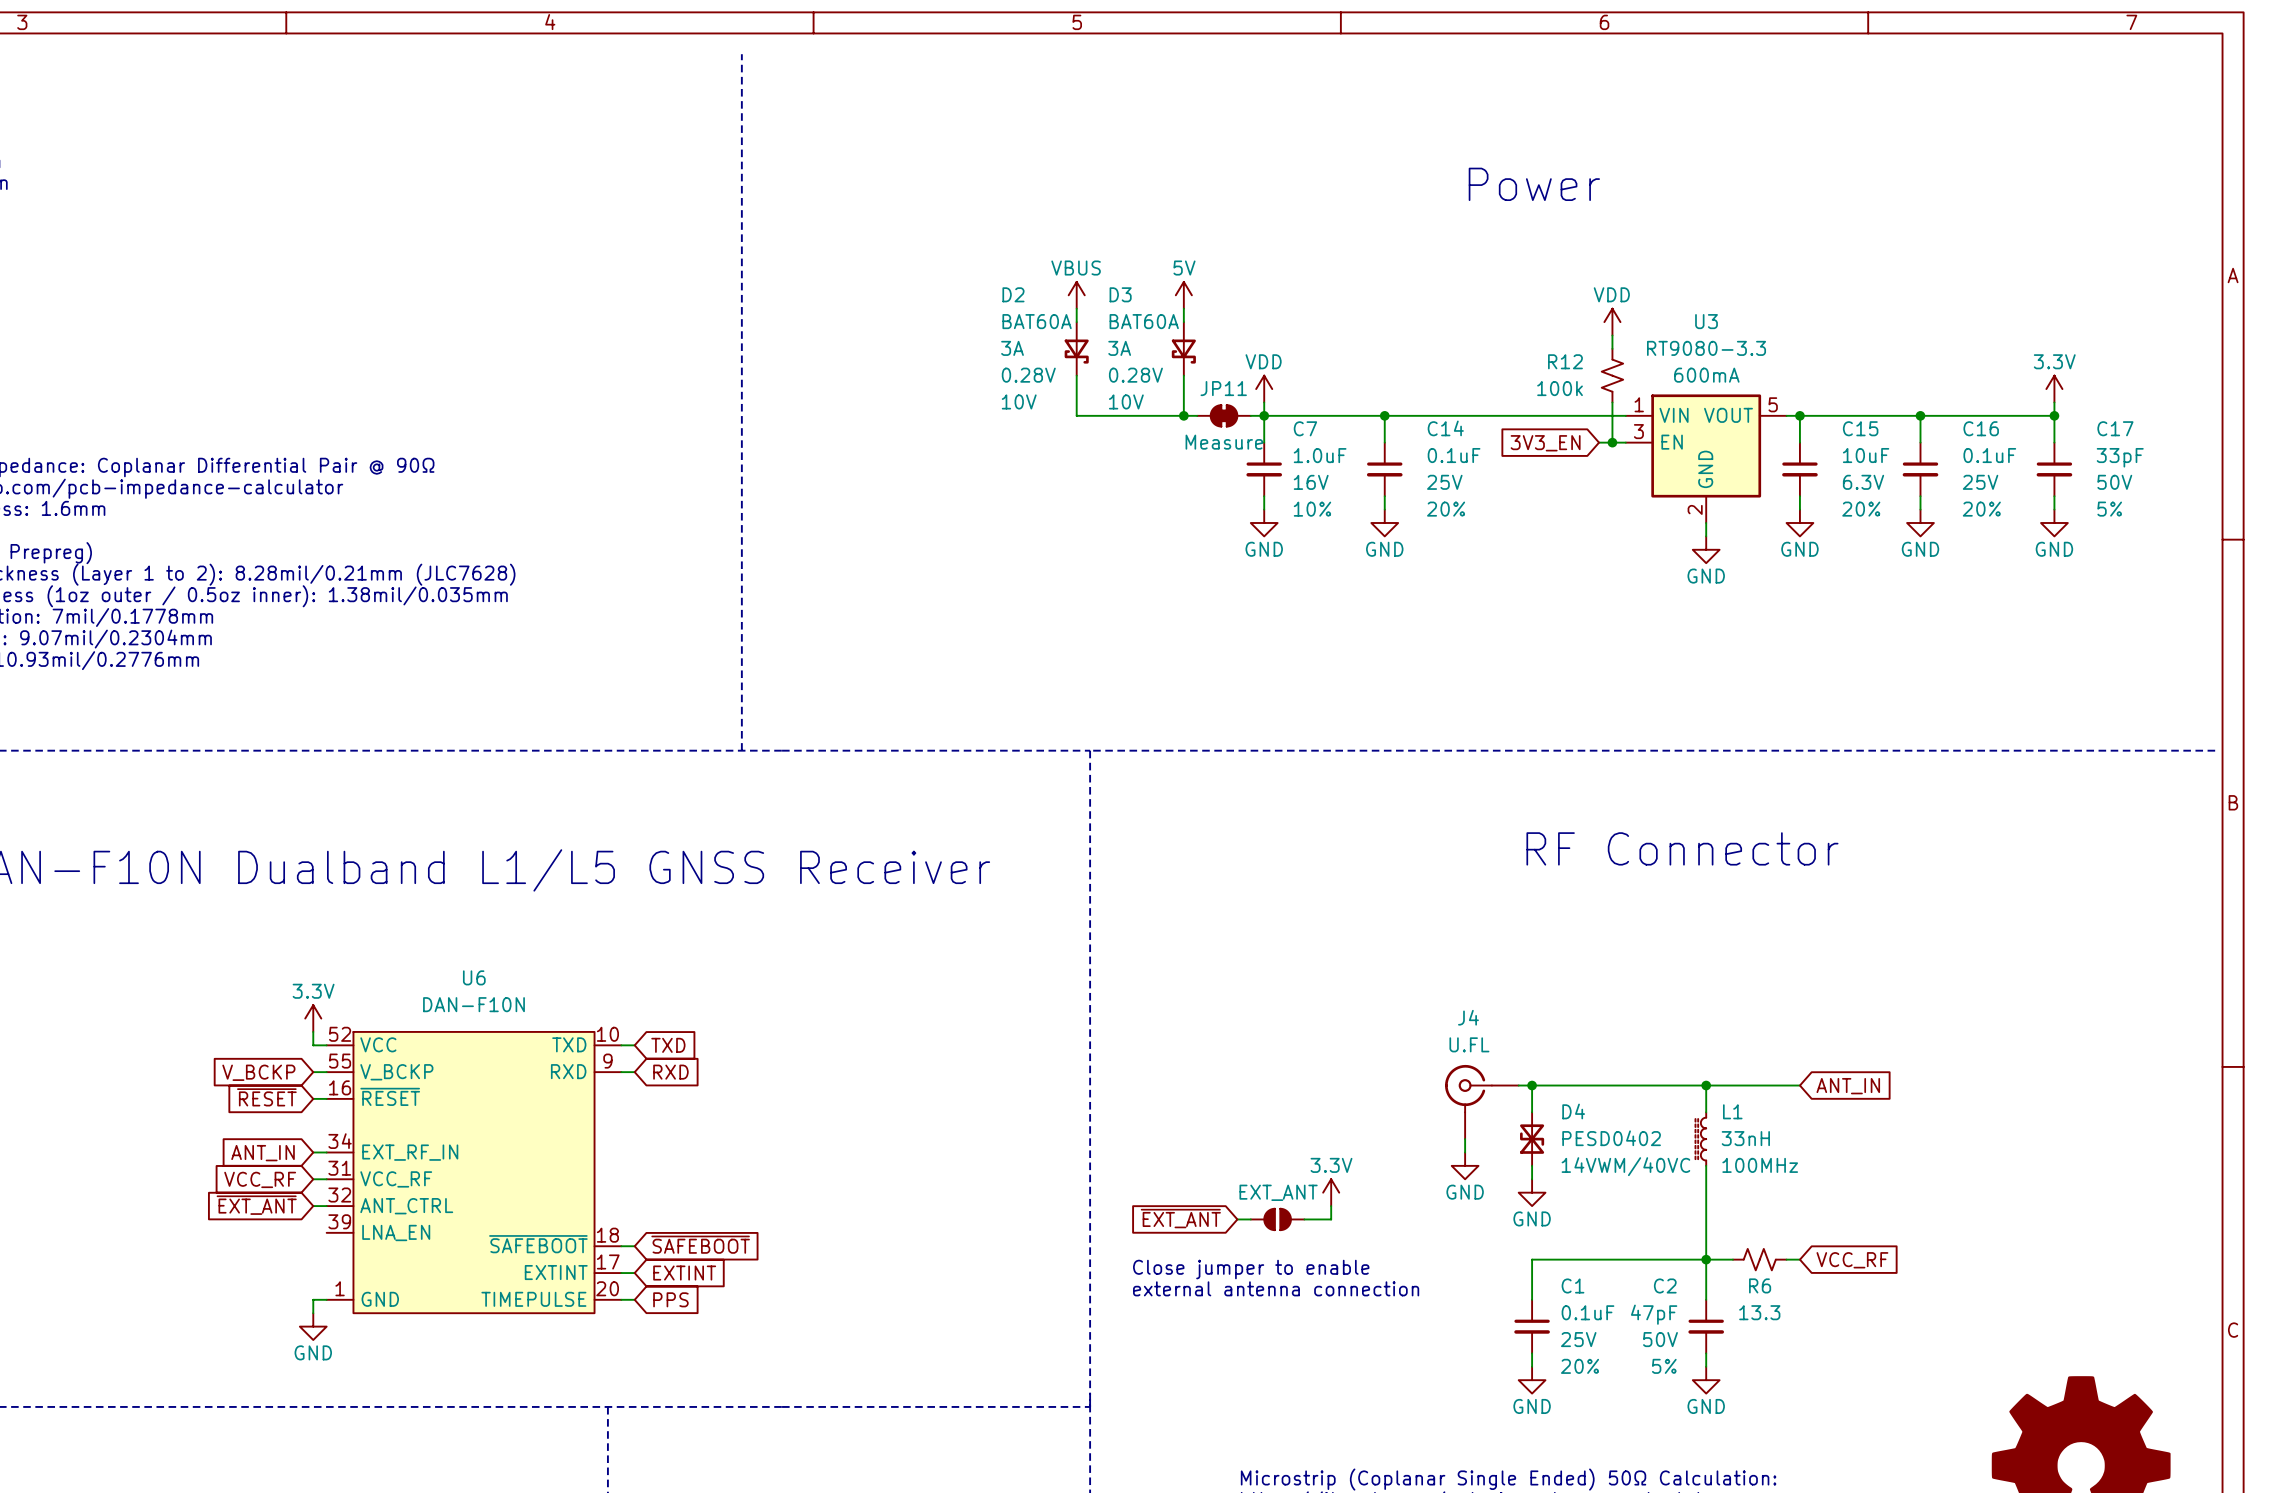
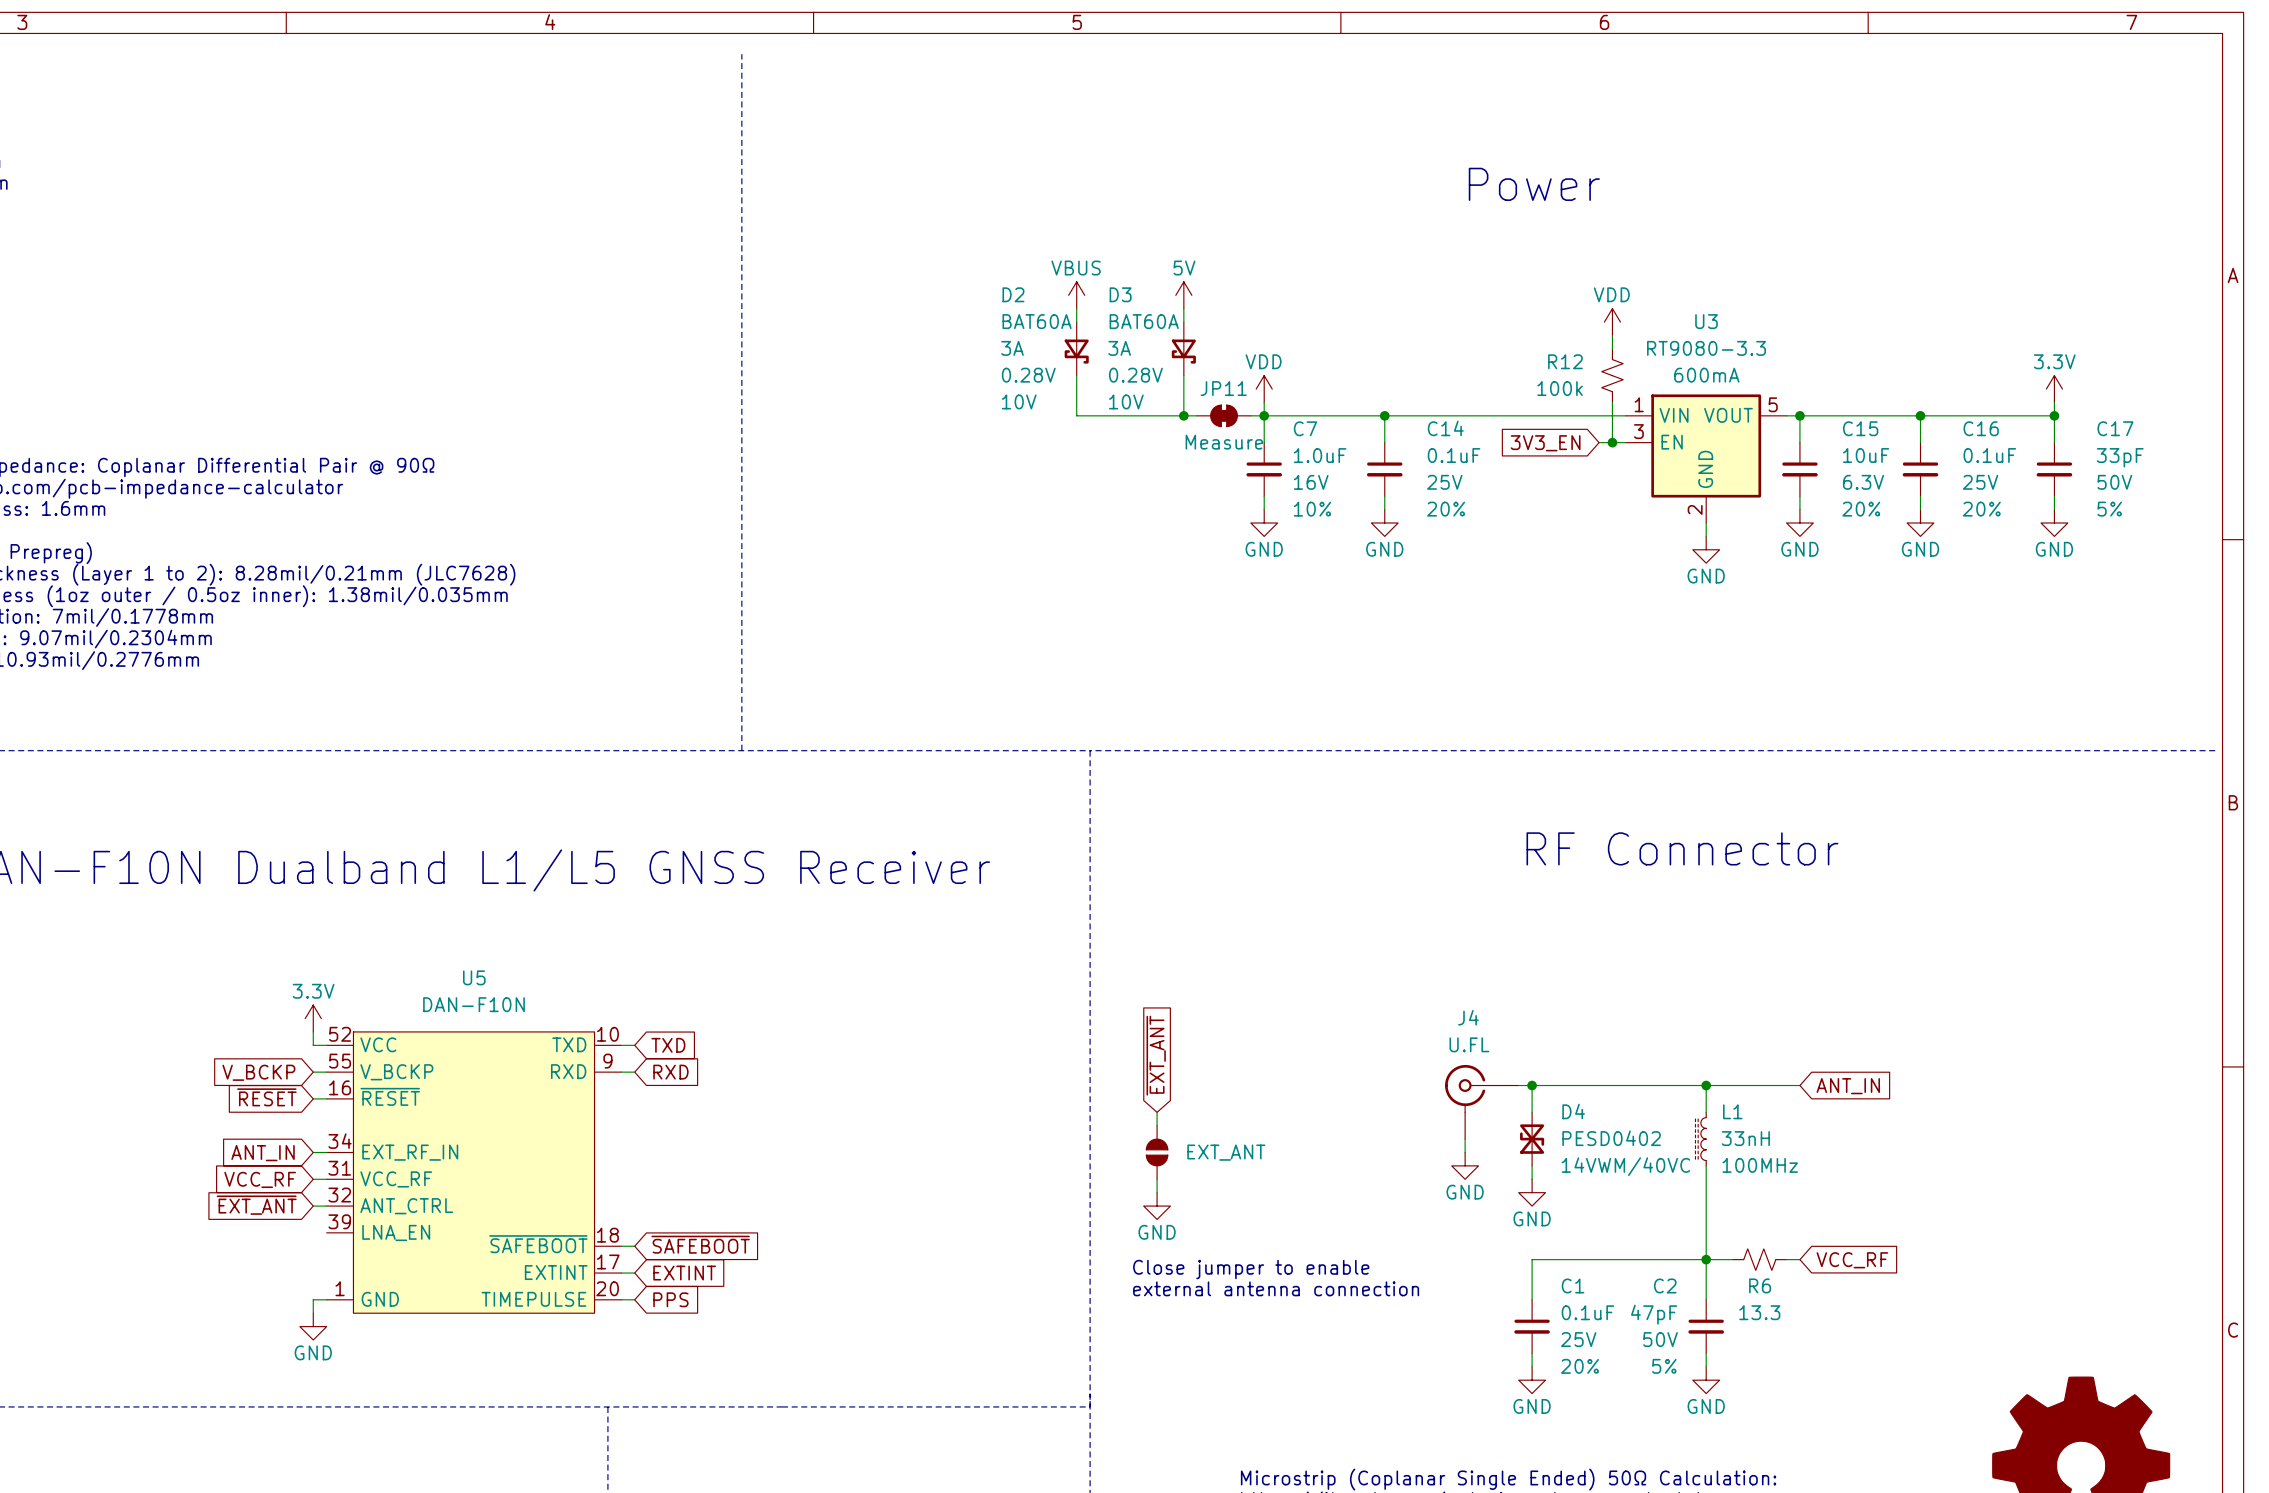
U6 name: U6 (474, 977) -> U5 (474, 977)
wire: none -> (1157, 1112) (1157, 1125)
wire: none -> (1157, 1179) (1157, 1192)
part value position: EXT_ANT (1278, 1192) -> EXT_ANT (1226, 1152)
power symbol: 3.3V (1331, 1192) -> none
power symbol: none -> GND (1157, 1206)
wire: (1331, 1206) (1331, 1219) (1304, 1219) -> none
global label rotation: 0° (1180, 1218) -> 90° clockwise (1156, 1055)
global label position: ~{EXT_ANT} (1180, 1218) -> ~{EXT_ANT} (1156, 1055)
wire: (1237, 1219) (1250, 1219) -> none
part rotation: 0° (1277, 1219) -> 90° clockwise (1157, 1152)
part position: (1277, 1219) -> (1157, 1152)

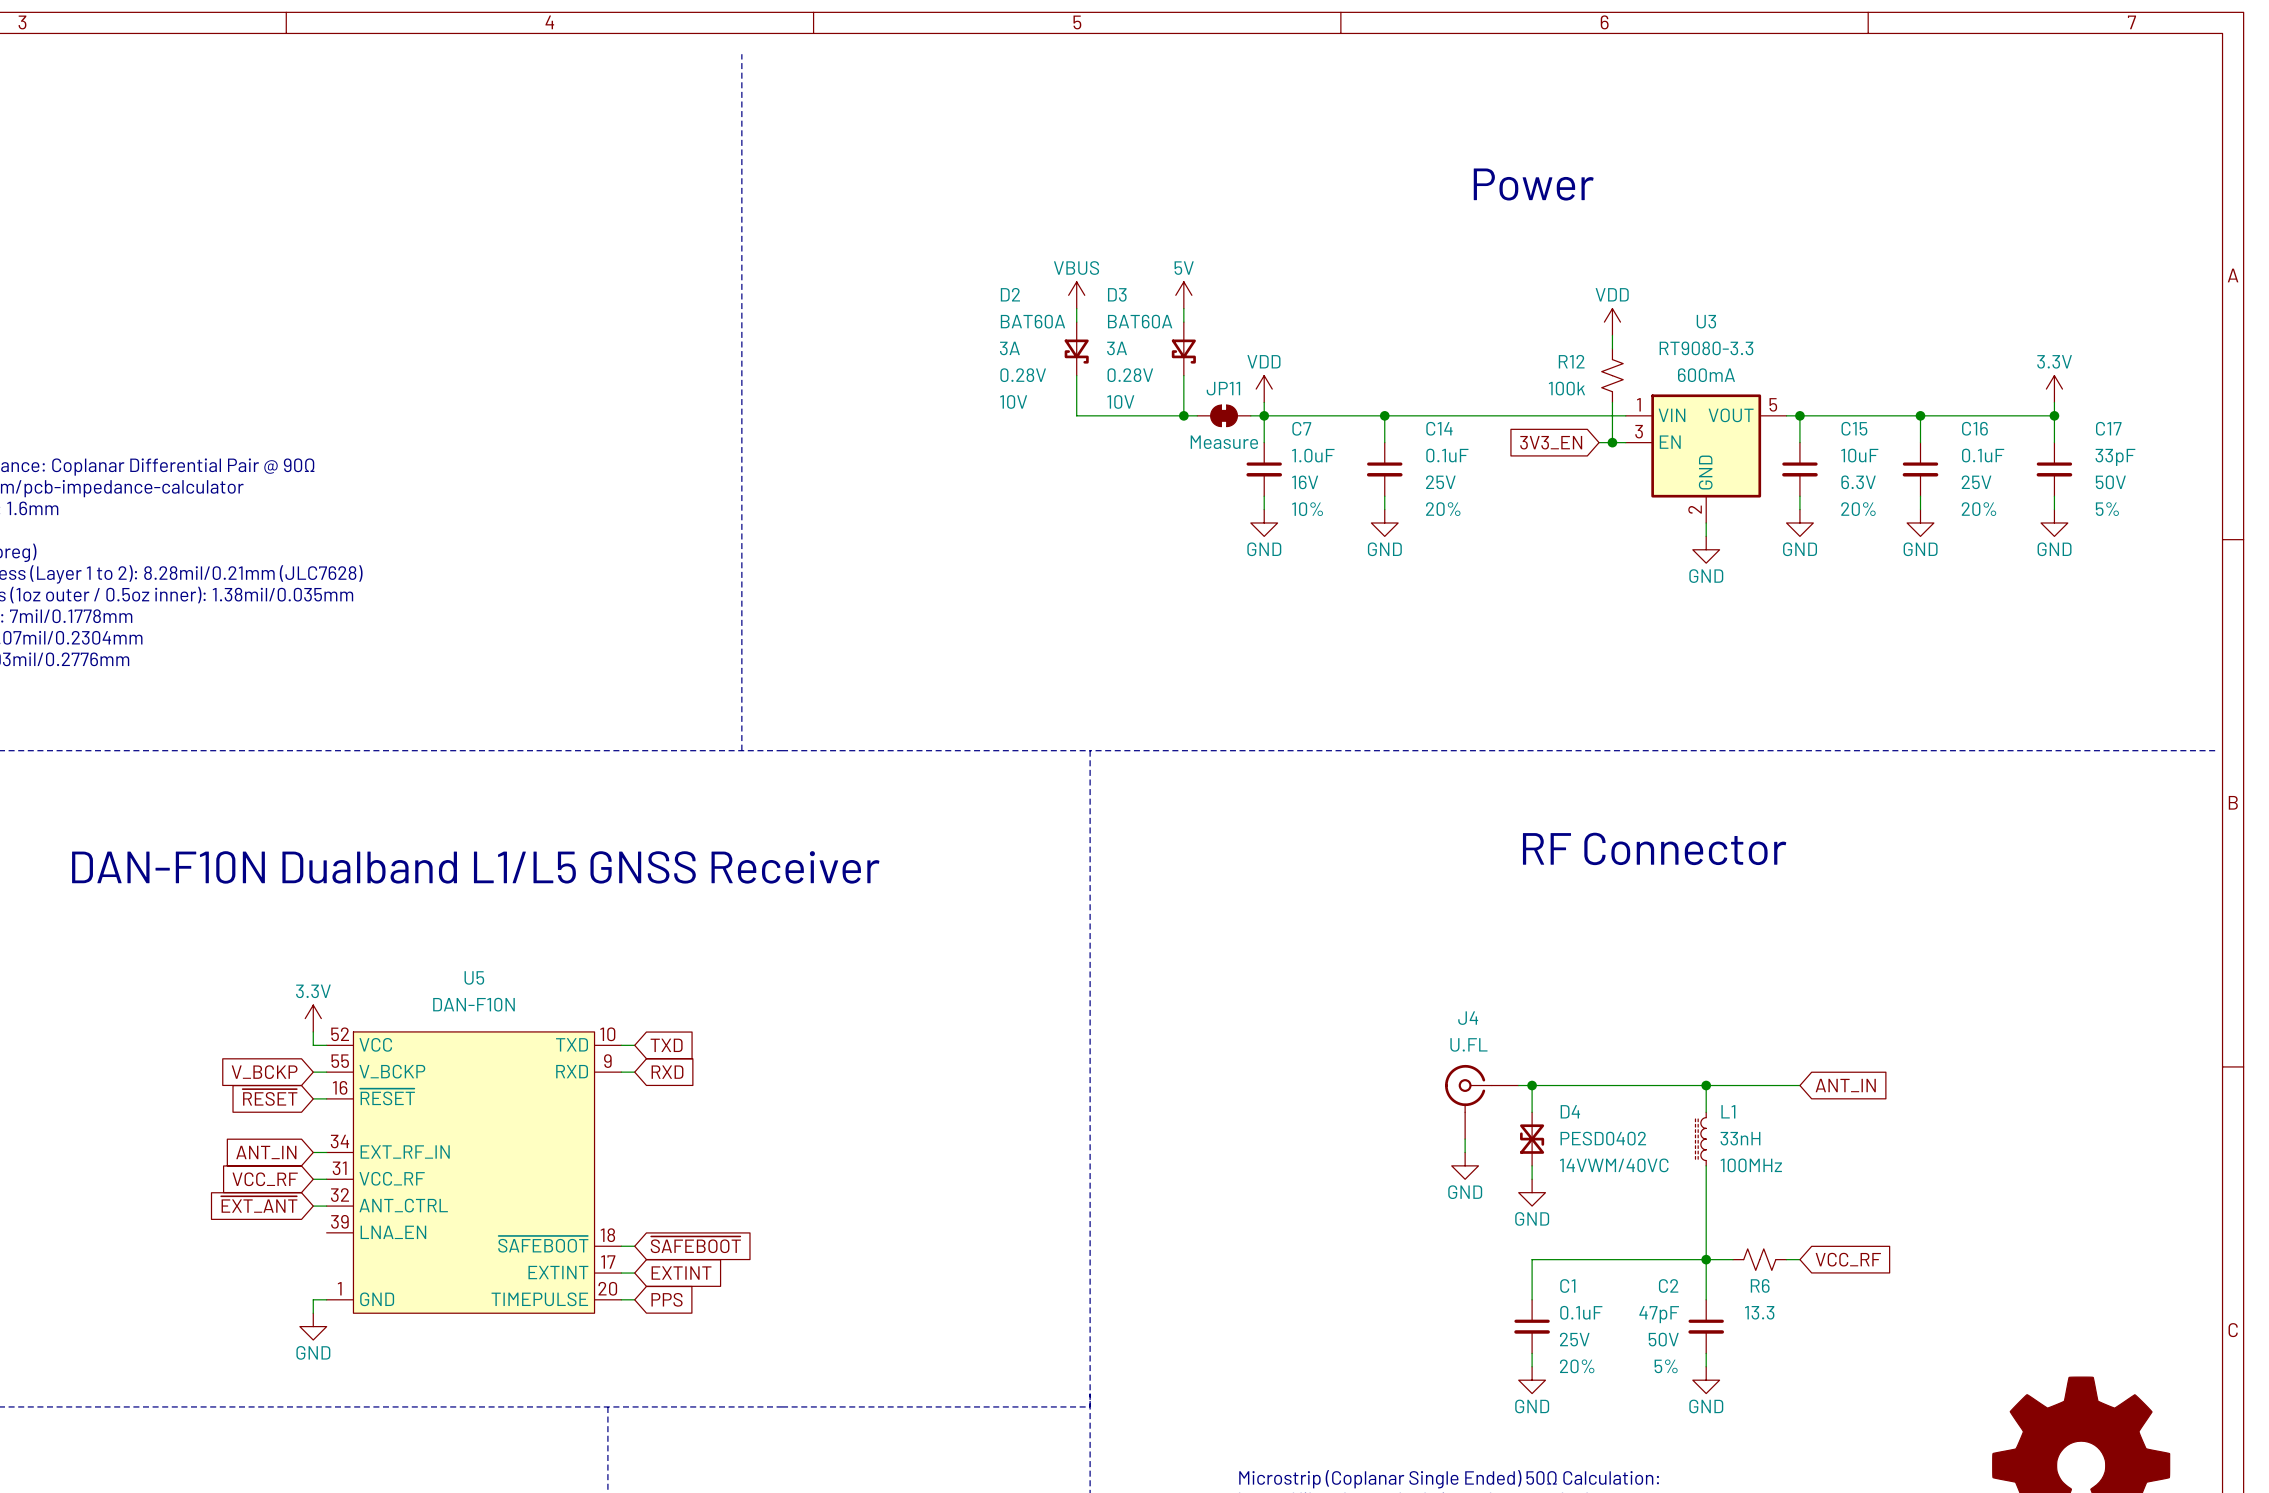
global label: ~{EXT_ANT} (1156, 1055) -> none
wire: (1157, 1112) (1157, 1125) -> none
part: EXT_ANT (1157, 1152) -> none
wire: (1157, 1179) (1157, 1192) -> none
power symbol: GND (1157, 1206) -> none
text: Close jumper to enable (1251, 1269) -> none
text: external antenna connection (1276, 1288) -> none

